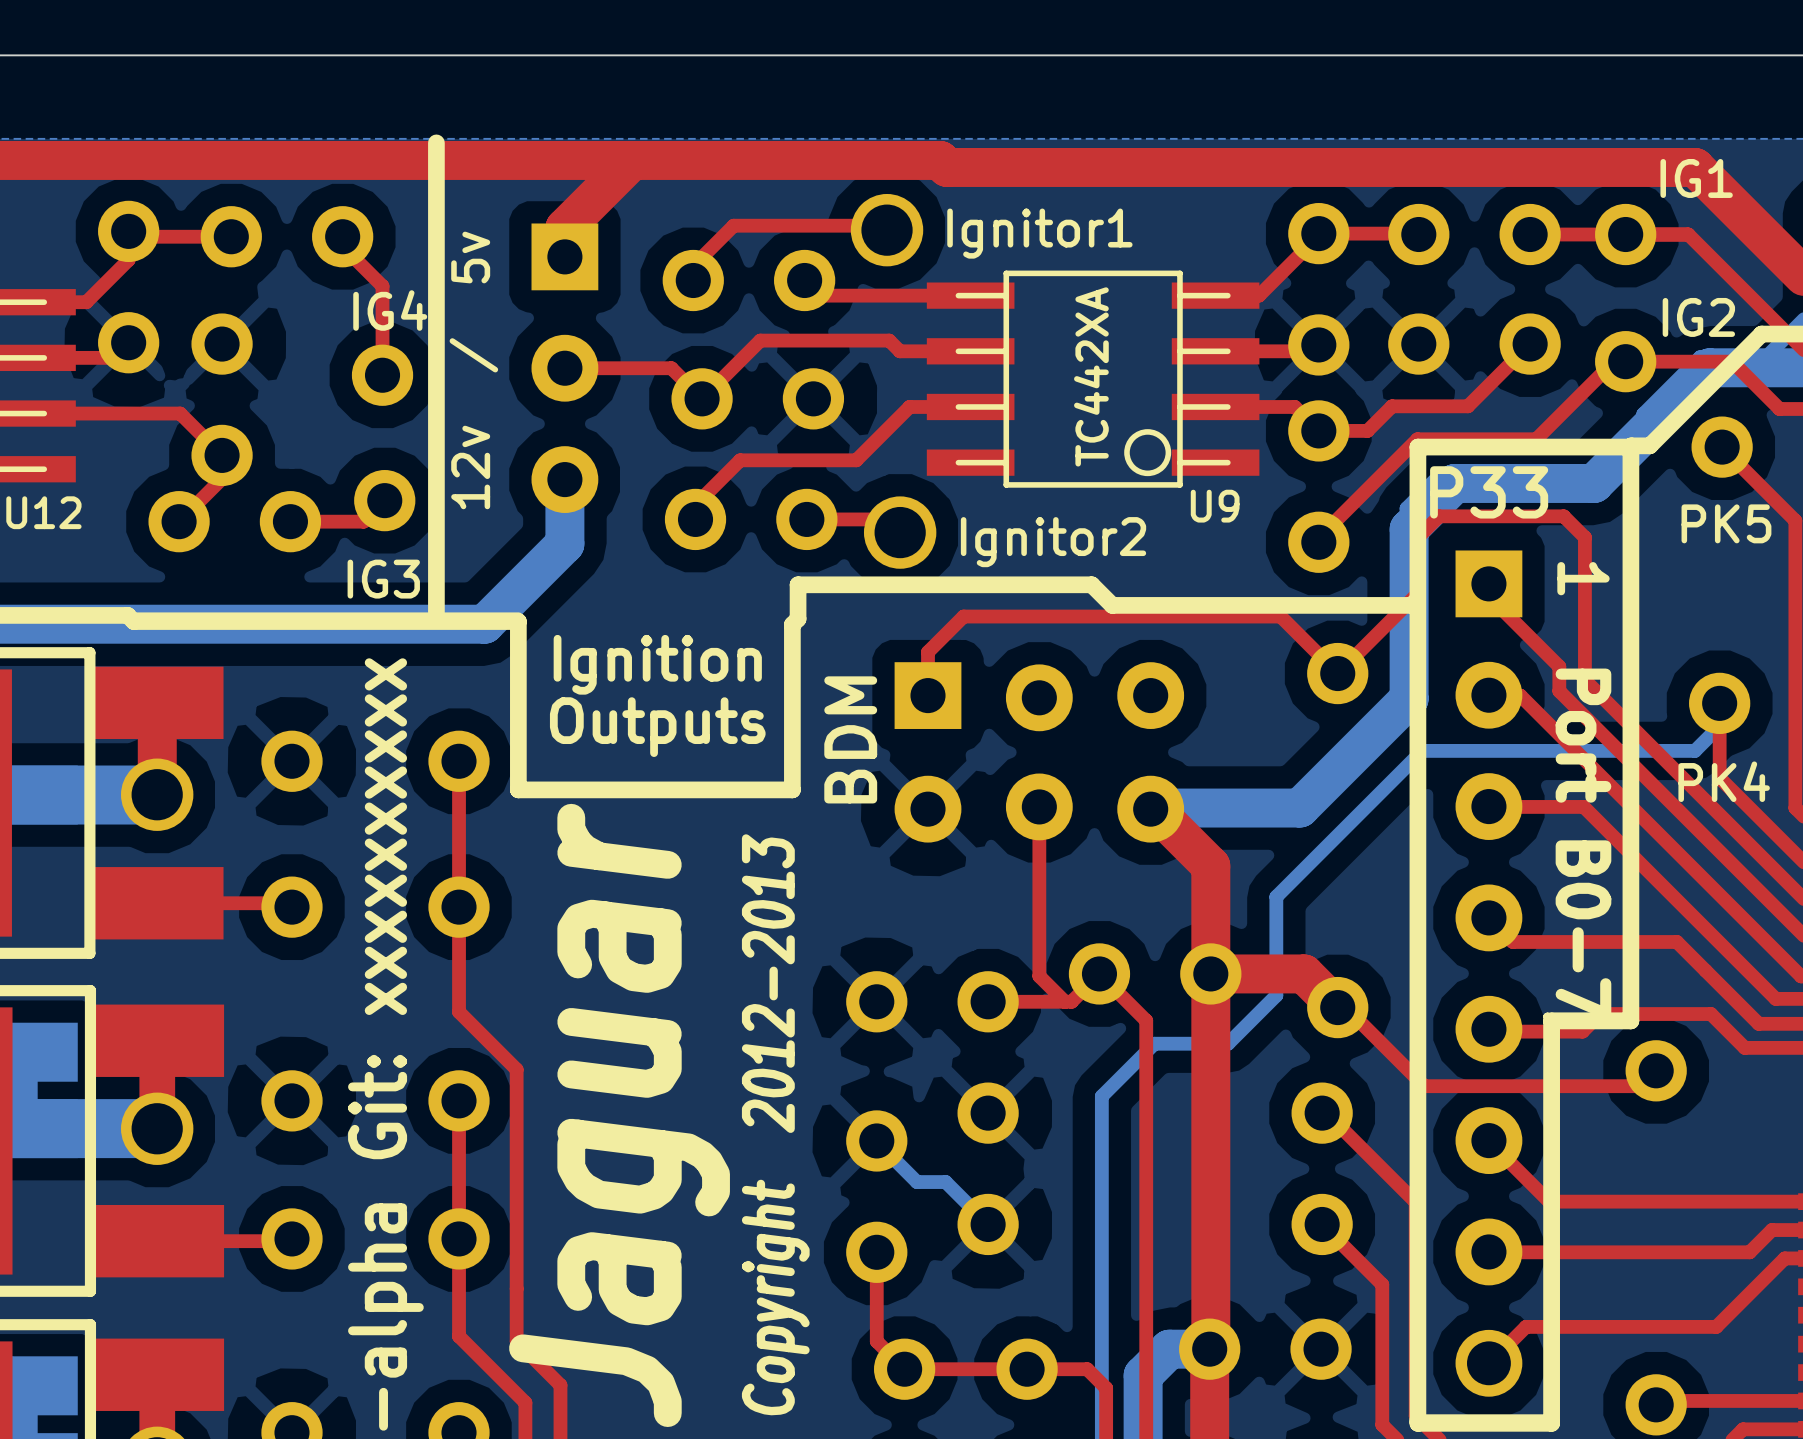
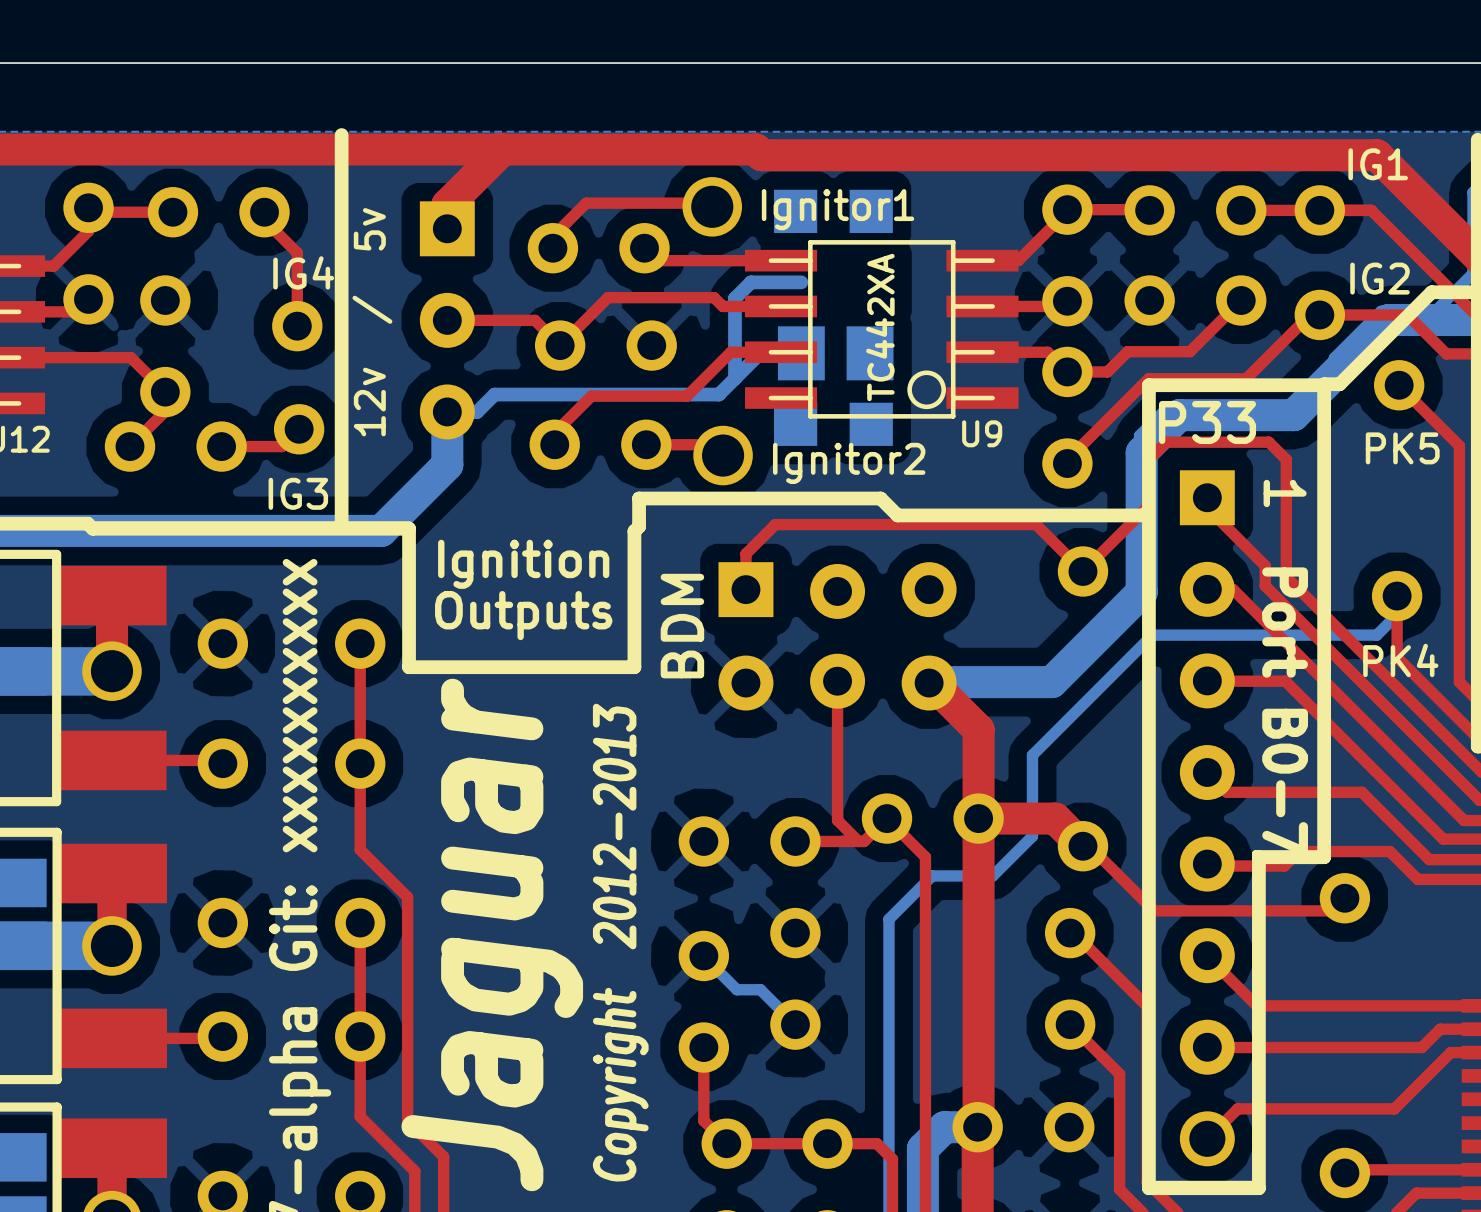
part: none -> (833, 211)
bottom track: none -> (801, 282) (751, 282) (734, 298) (734, 378)
bottom track: none -> (801, 353) (760, 353) (718, 394) (494, 394) (477, 411) (447, 411)
part: none -> (835, 353)
part: none -> (833, 424)

